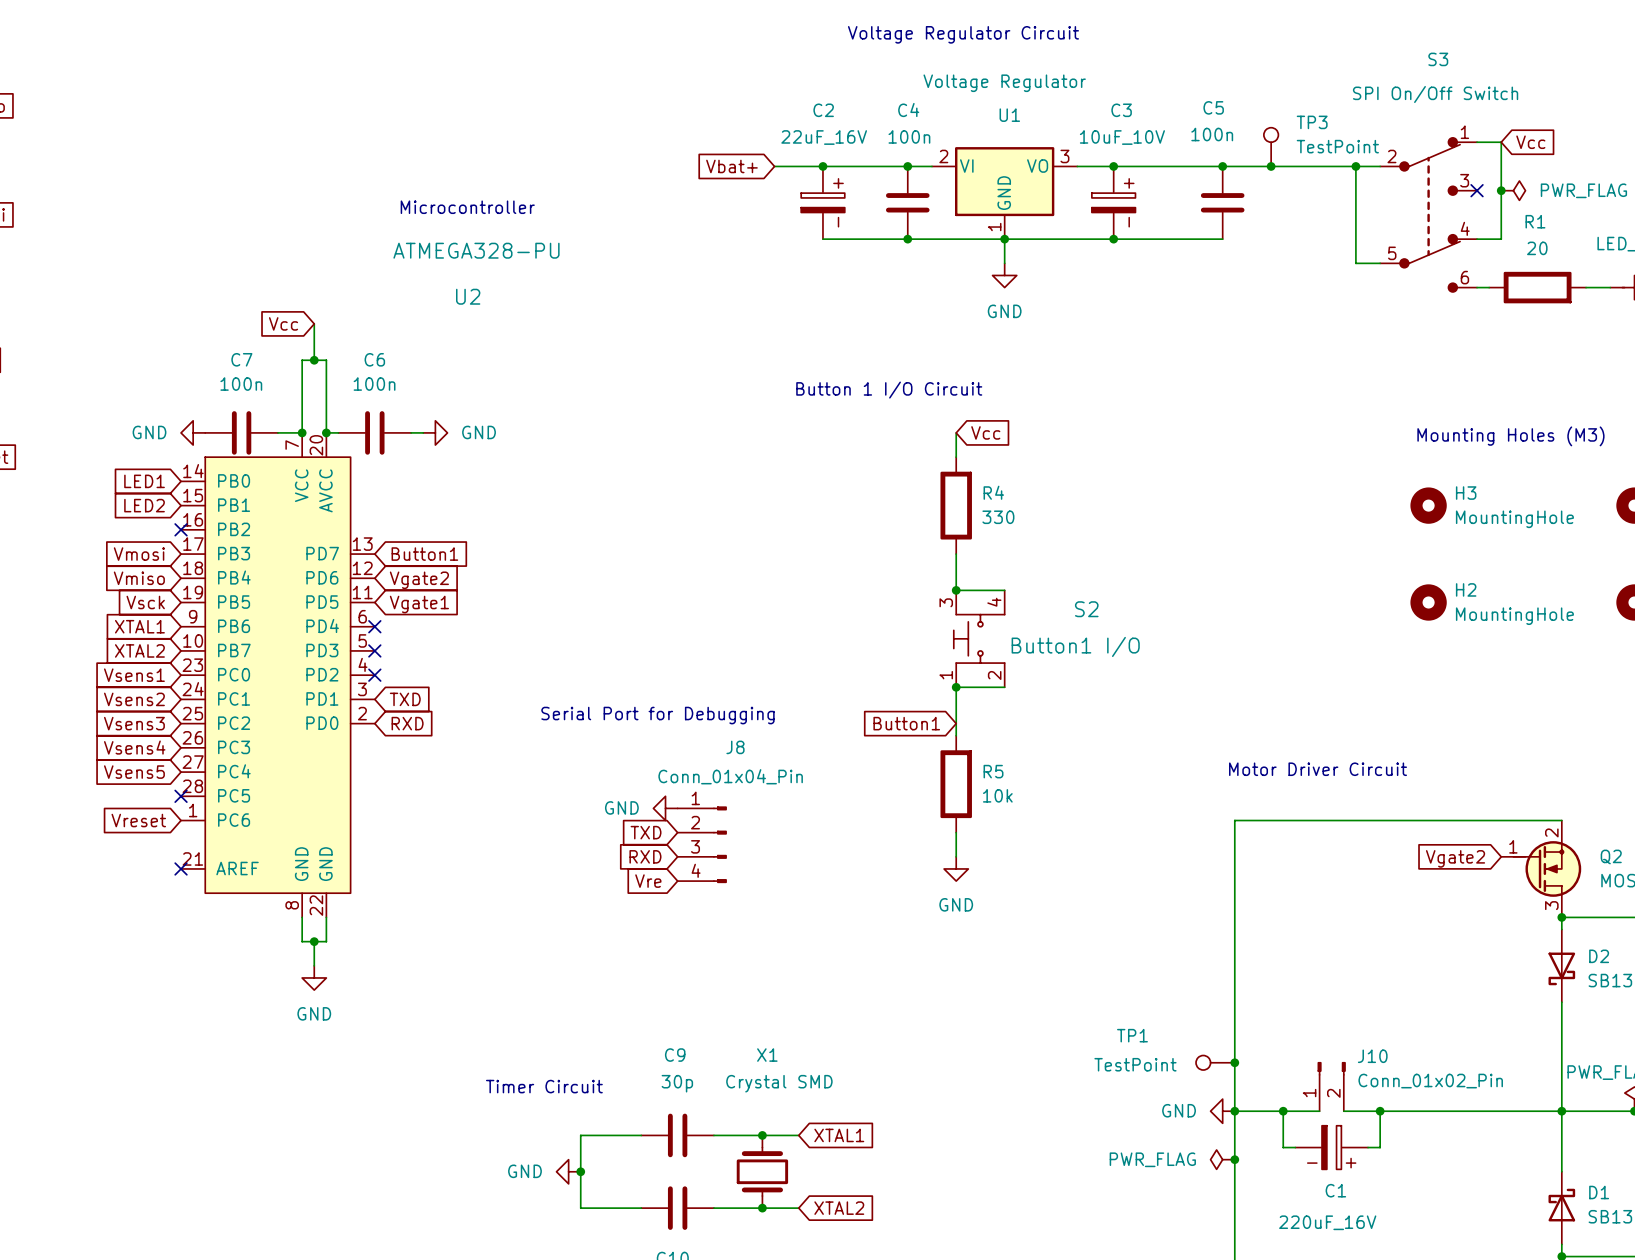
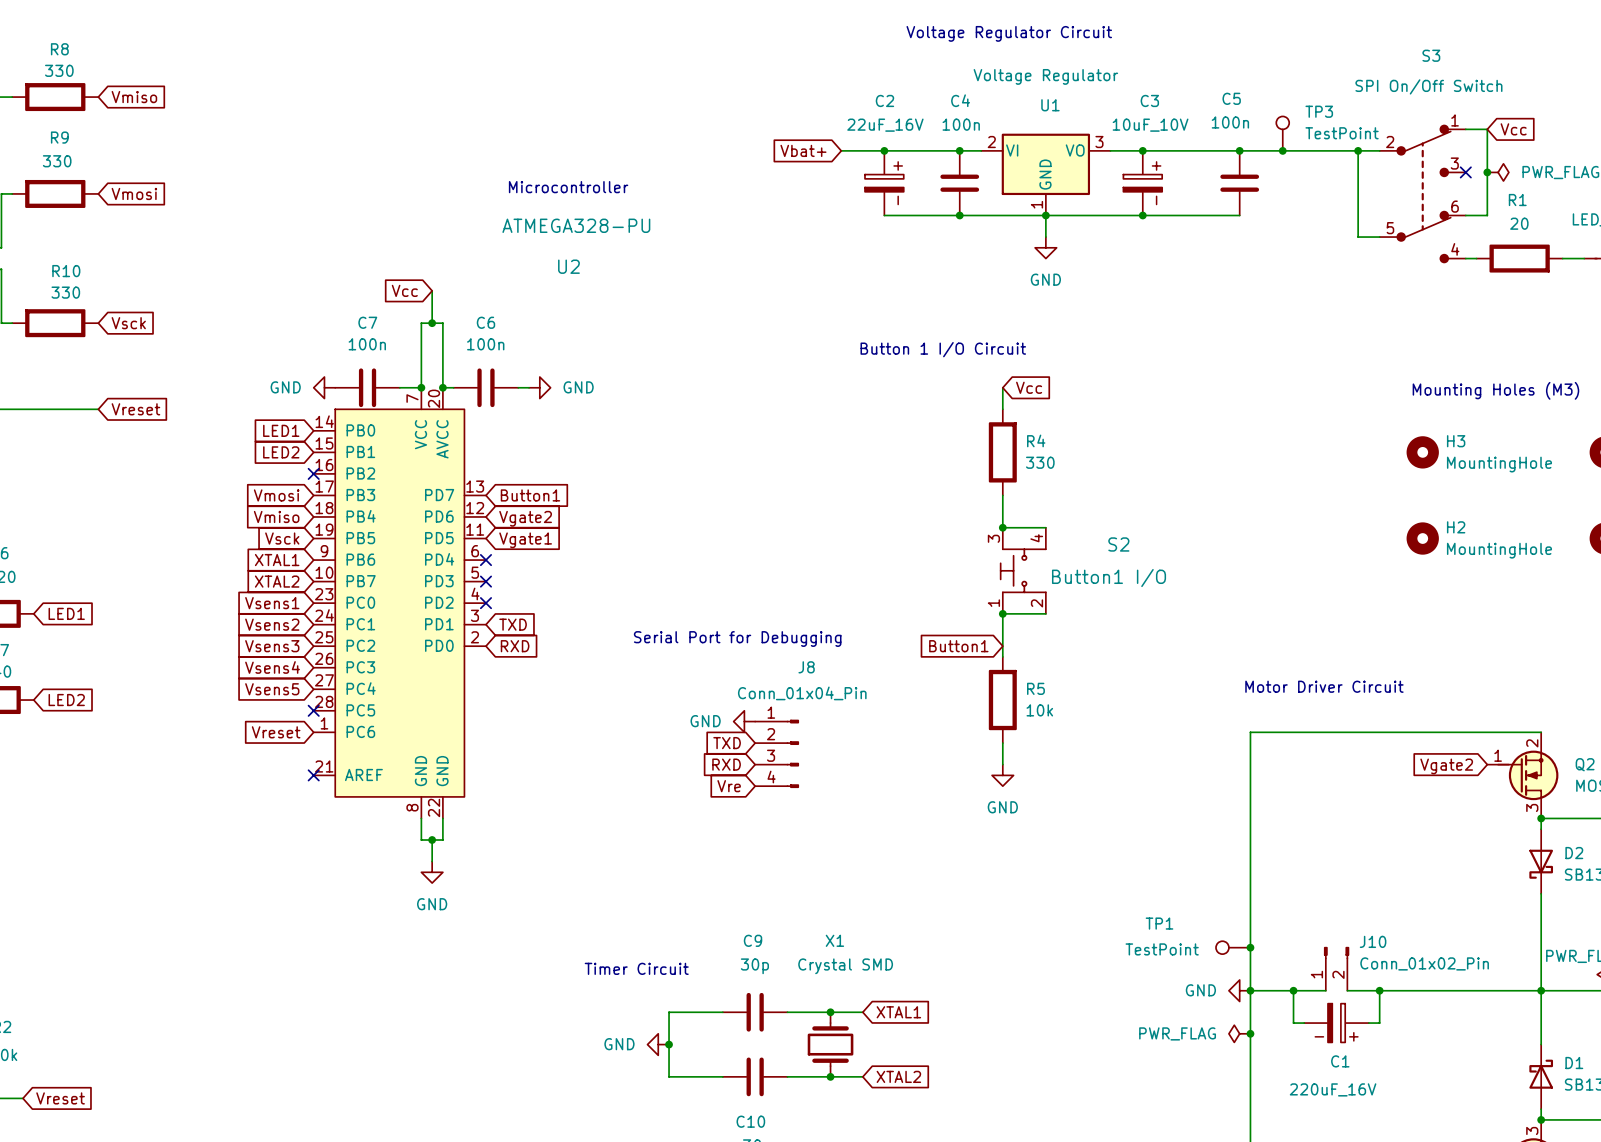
S3 pin number: 4 (1465, 228) -> 6 (1455, 206)
S3 pin number: 6 (1464, 277) -> 4 (1455, 249)

